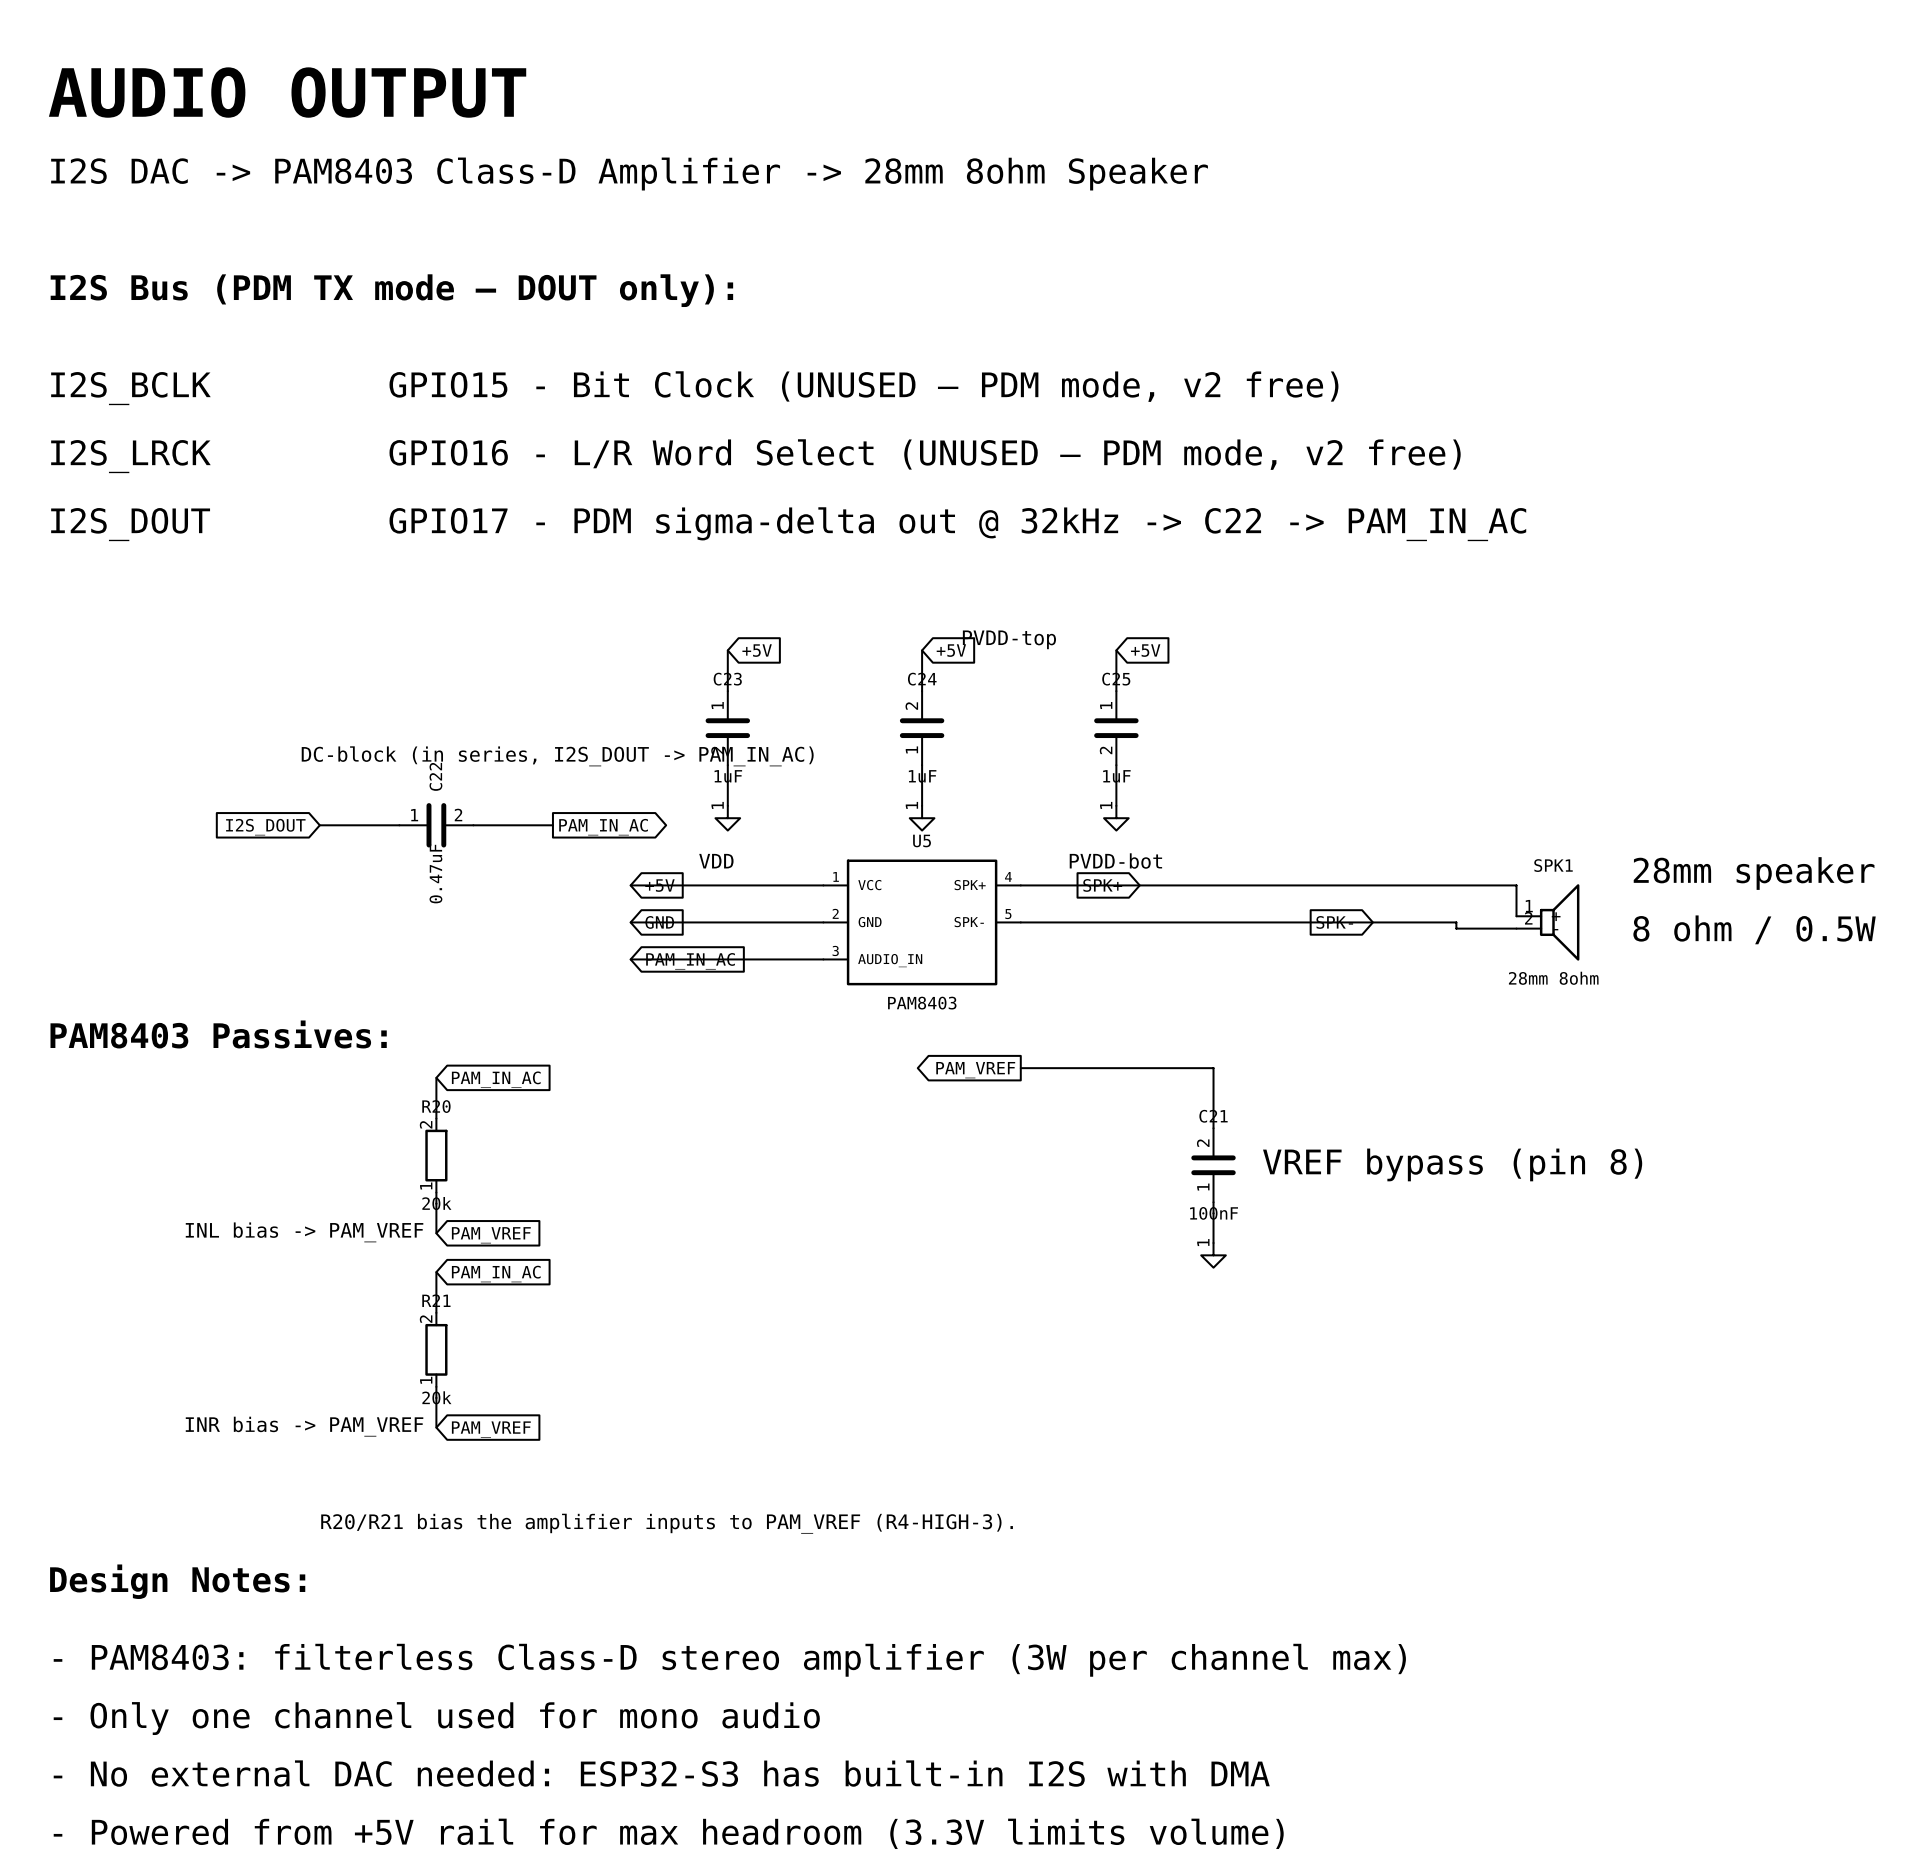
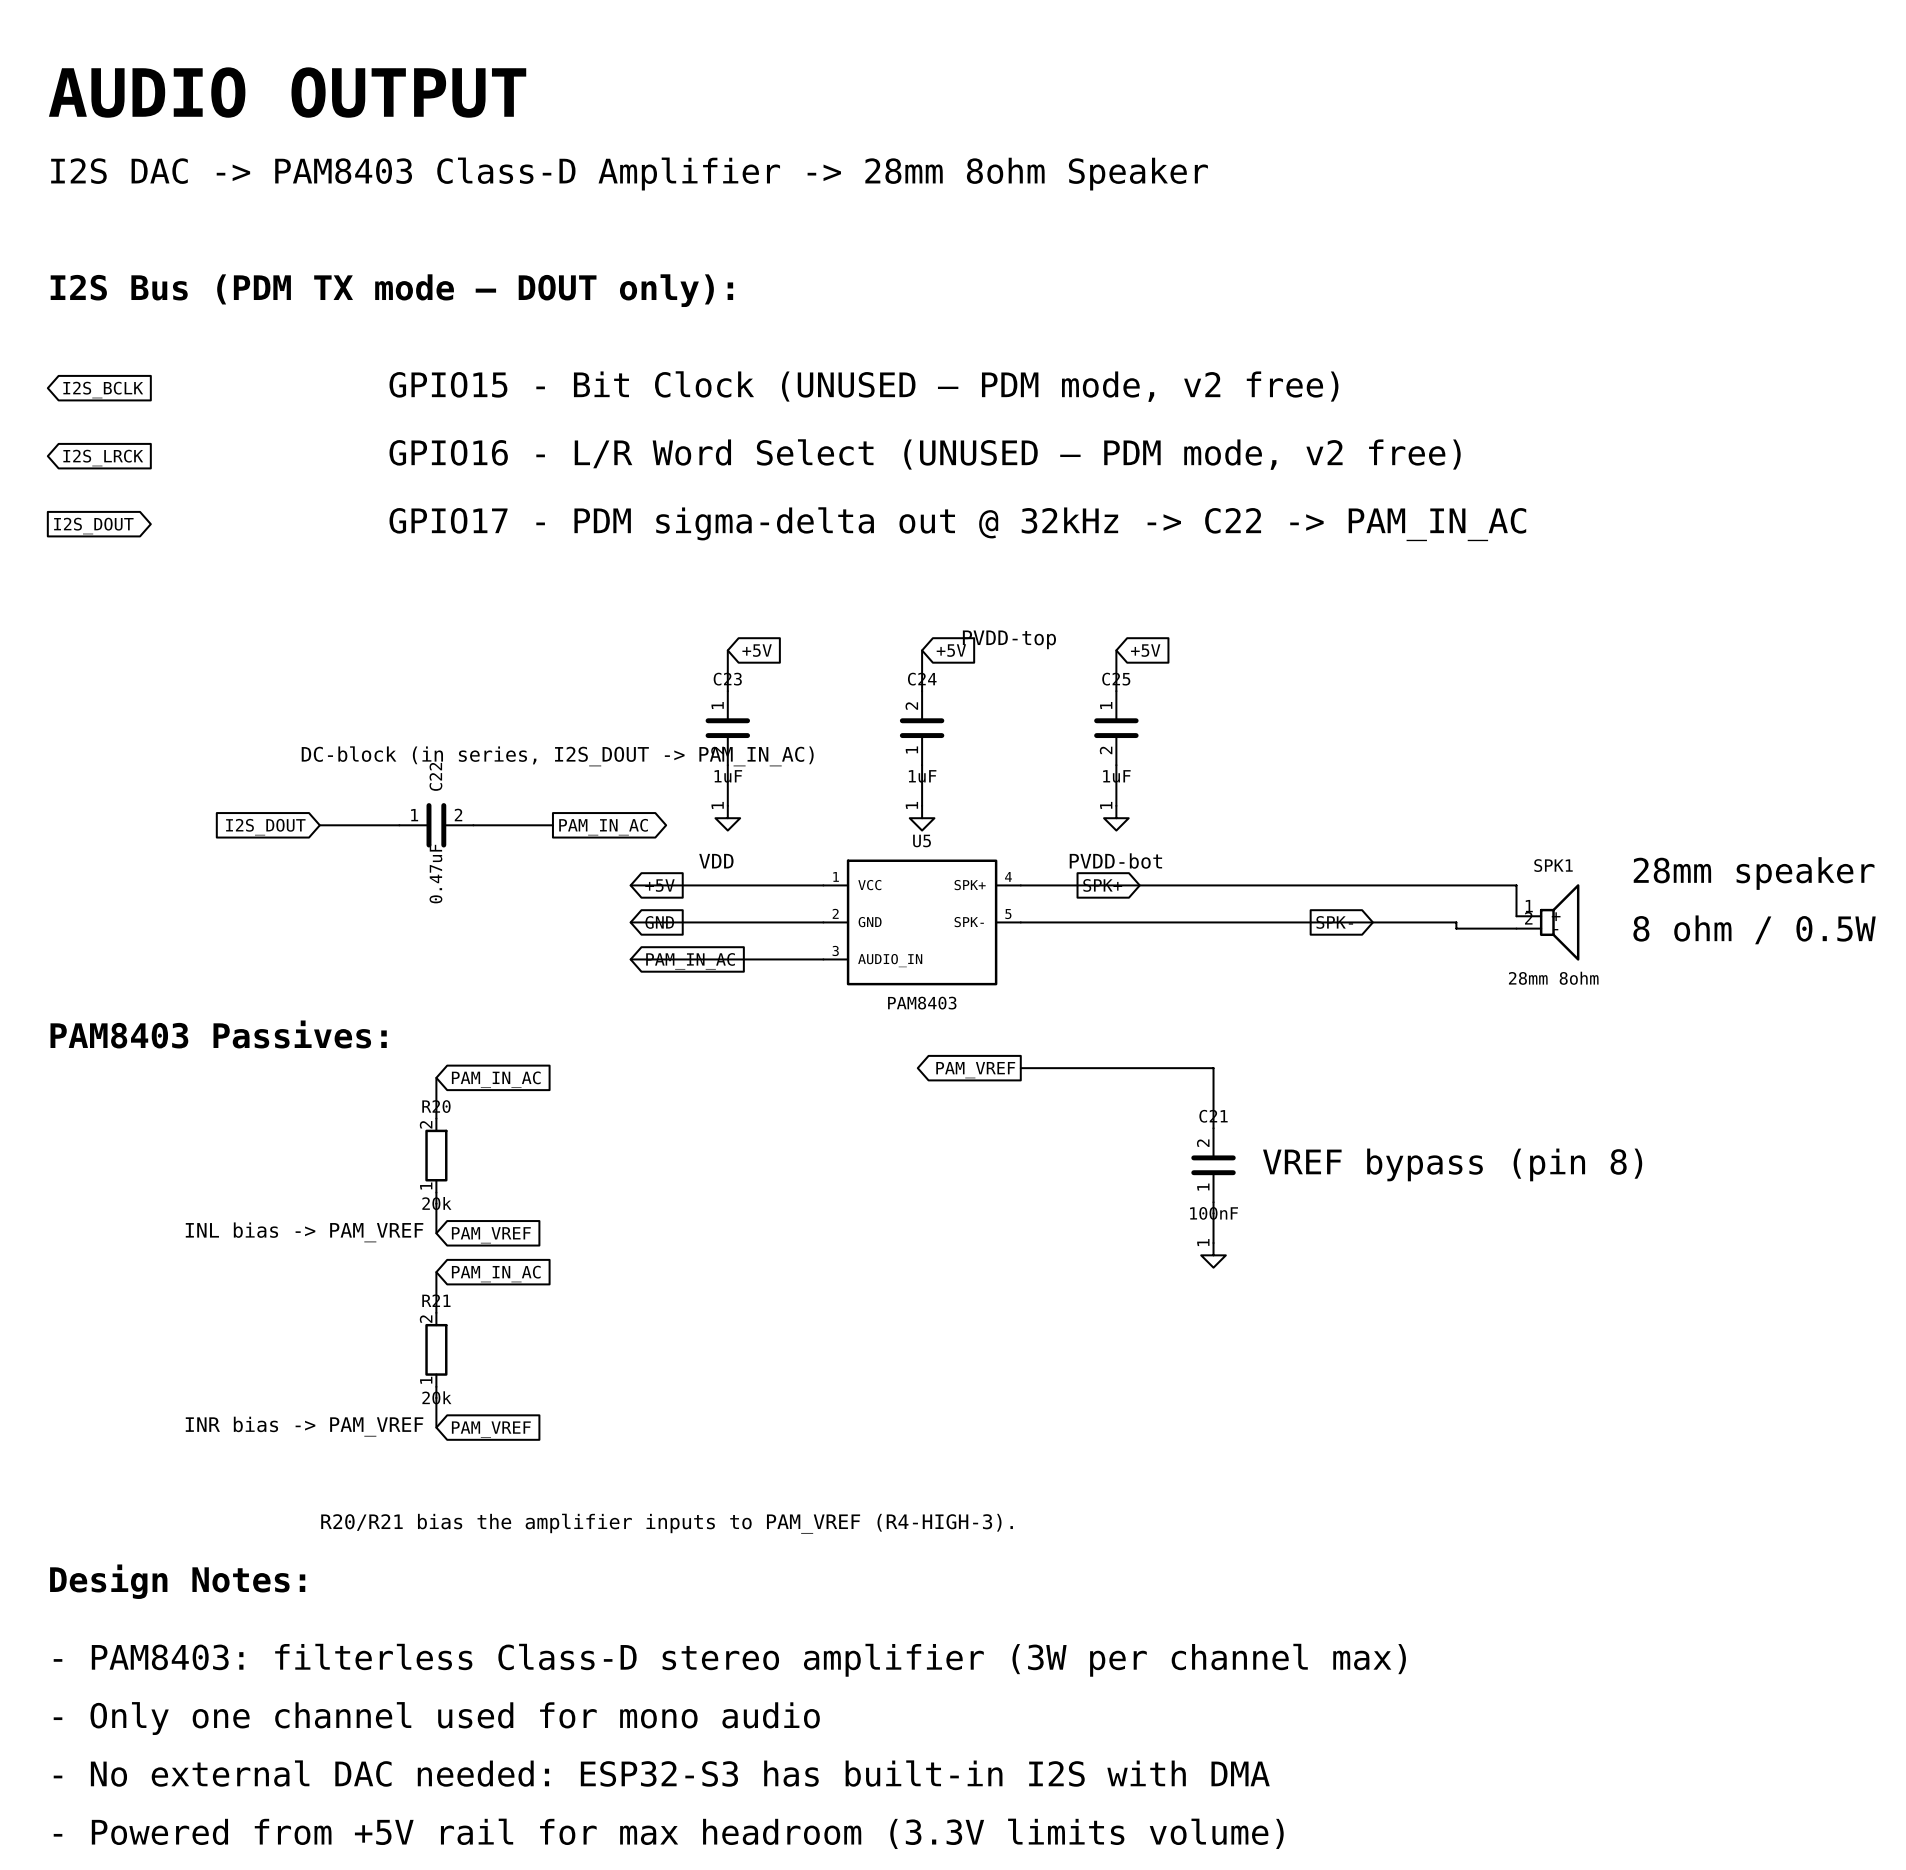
text: I2S_BCLK (130, 388) -> none
global label: none -> I2S_BCLK (103, 390)
text: I2S_LRCK (130, 456) -> none
global label: none -> I2S_LRCK (103, 458)
text: I2S_DOUT (130, 524) -> none
global label: none -> I2S_DOUT (93, 526)

